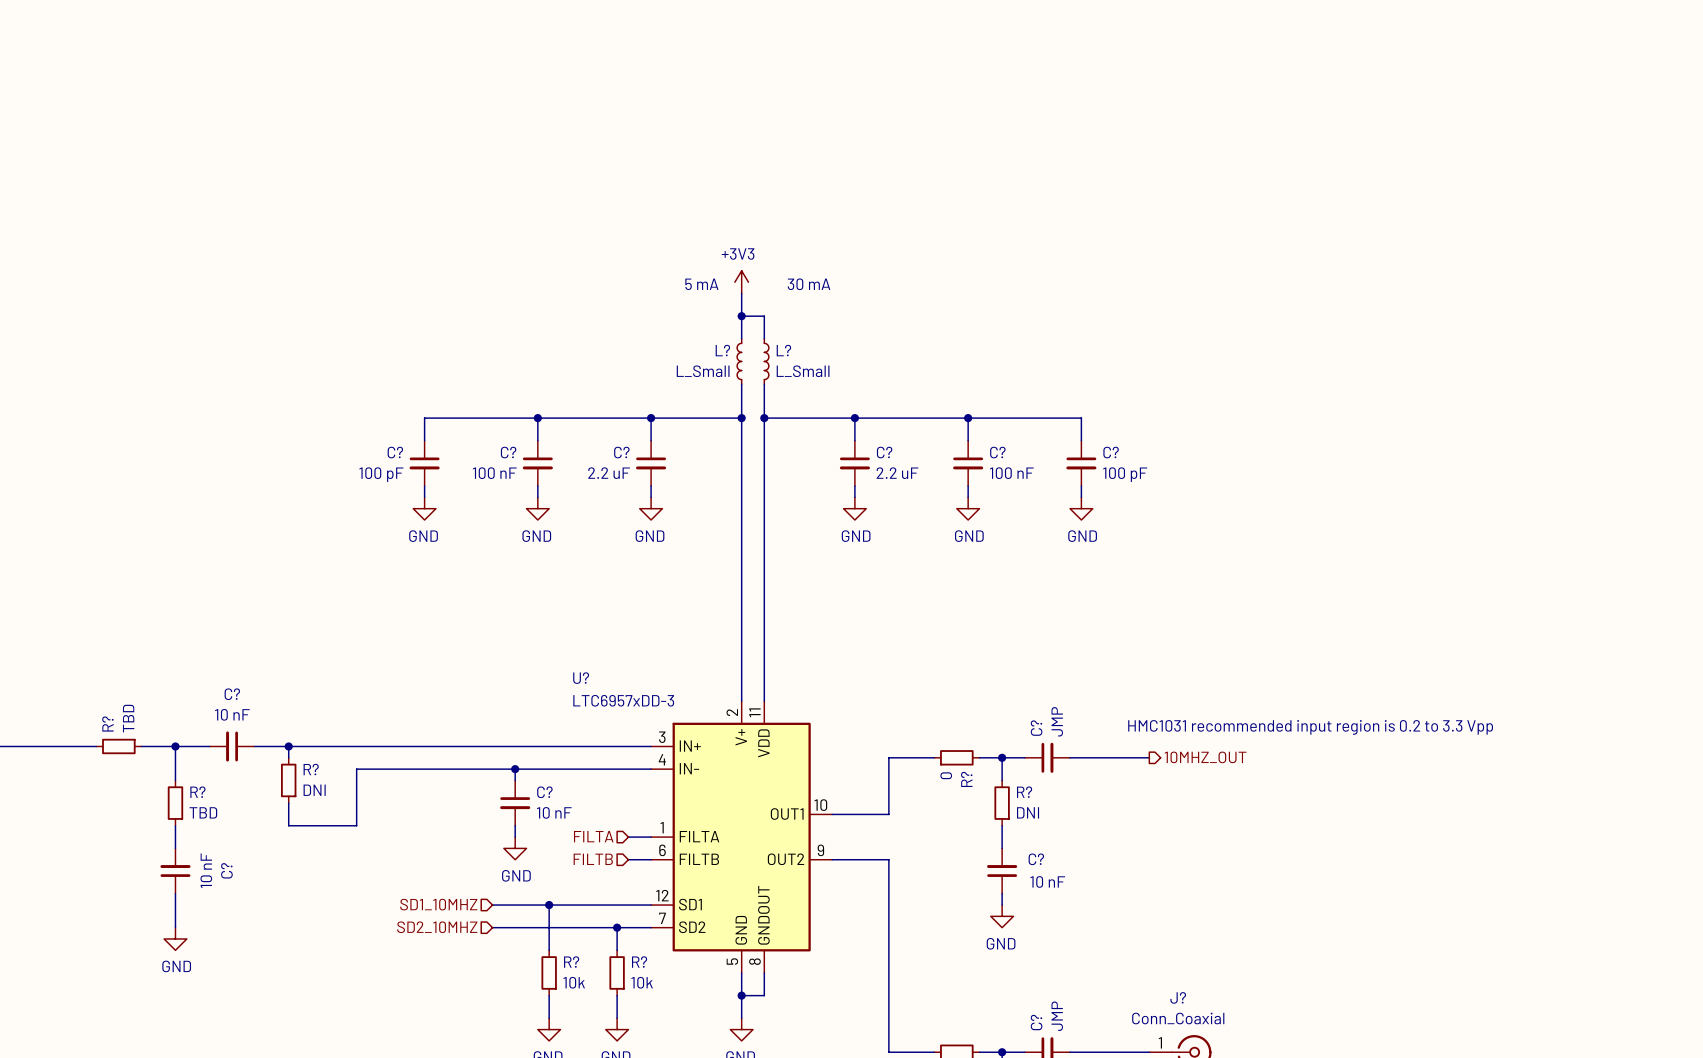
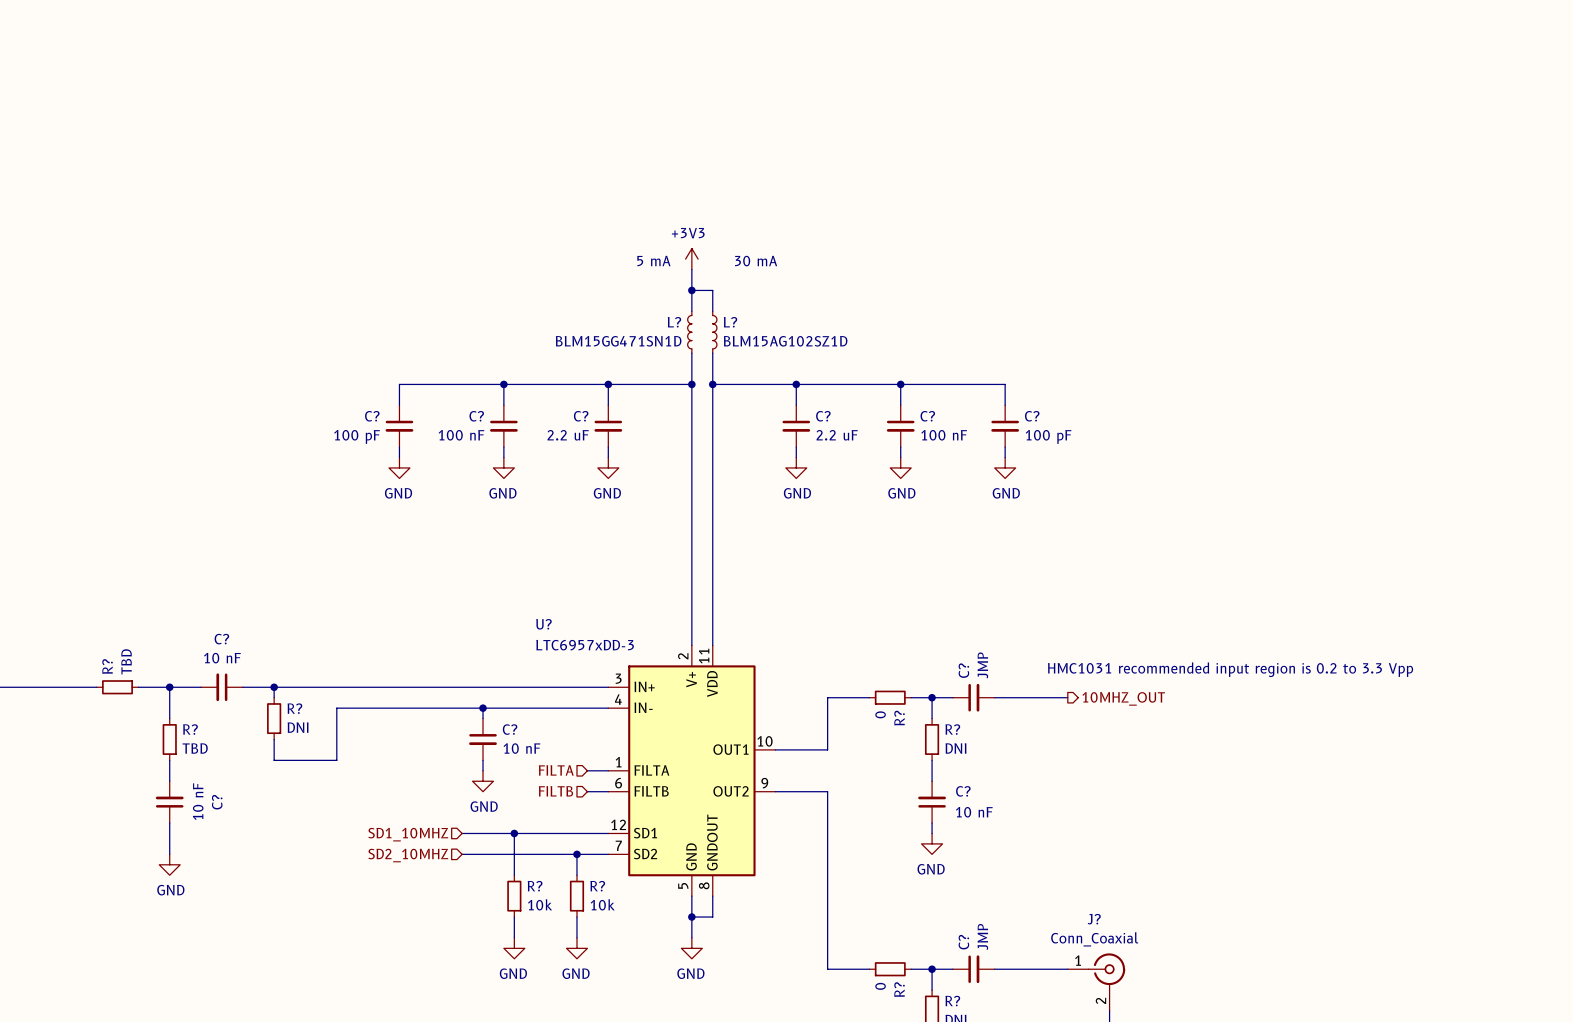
L? value: L_Small (703, 371) -> BLM15GG471SN1D (618, 341)
L? value: L_Small (803, 371) -> BLM15AG102SZ1D (785, 341)

